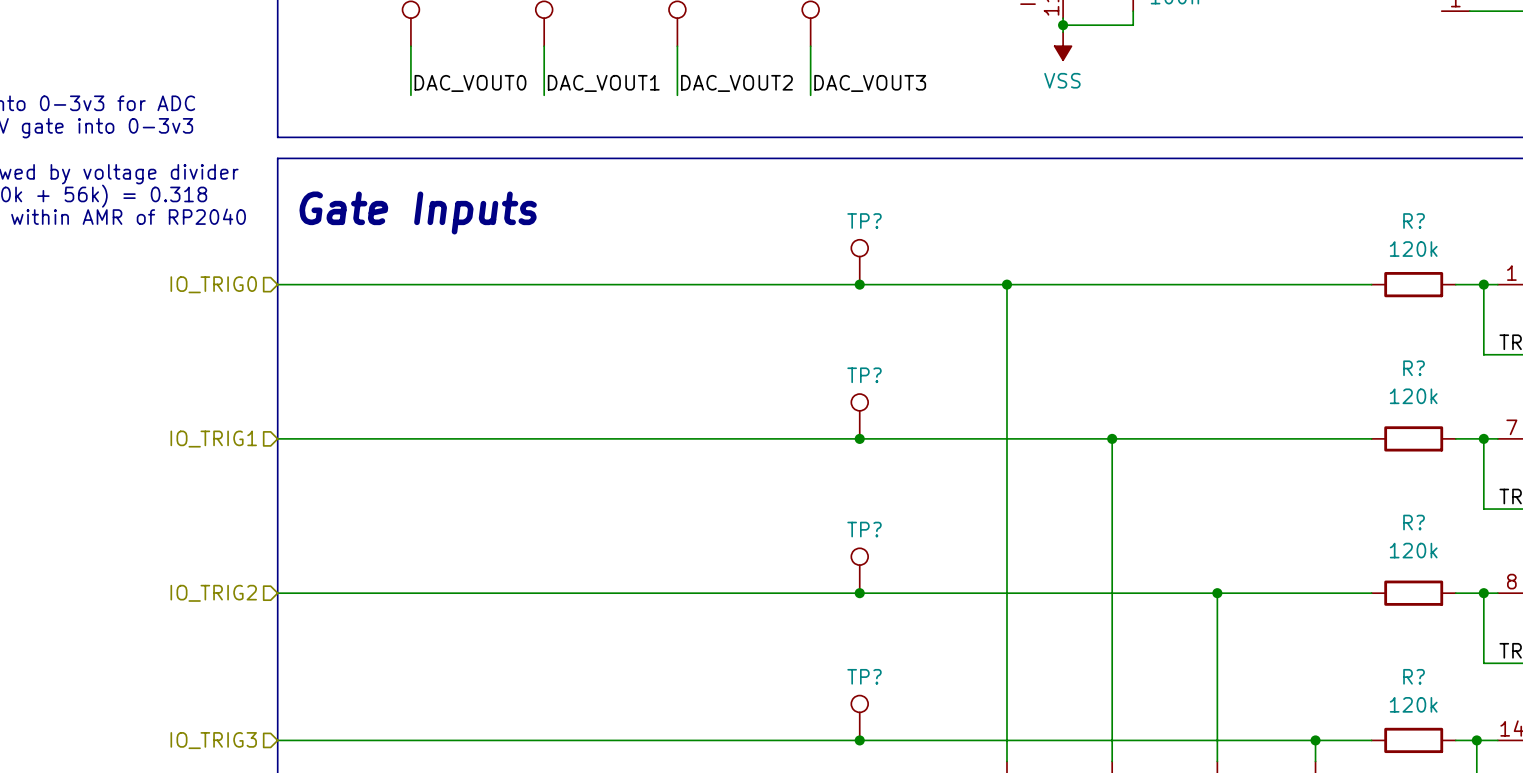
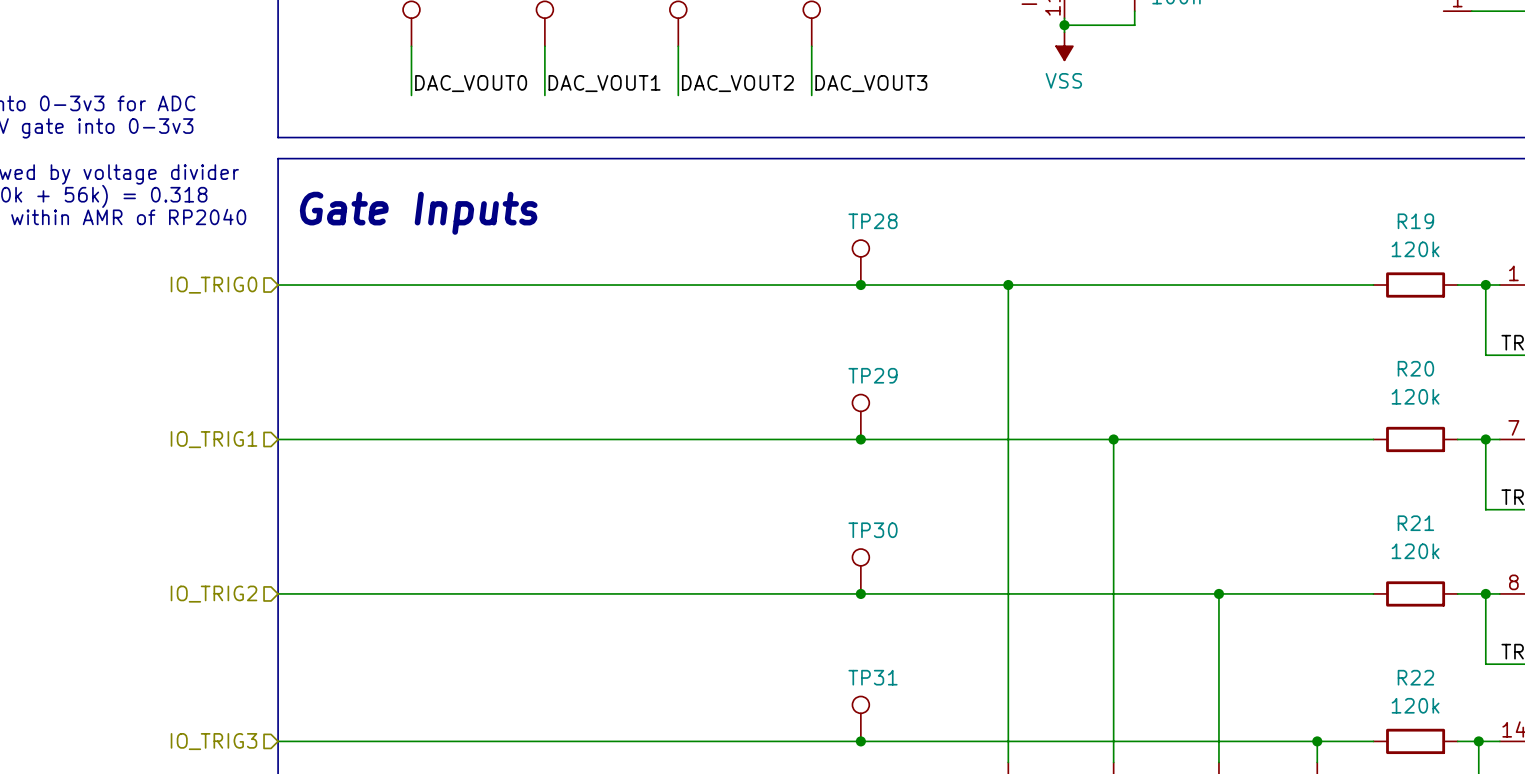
TP? name: TP? (864, 220) -> TP28 (873, 221)
R? name: R? (1414, 220) -> R19 (1415, 221)
R? name: R? (1414, 368) -> R20 (1415, 368)
TP? name: TP? (864, 375) -> TP29 (873, 375)
R? name: R? (1414, 522) -> R21 (1415, 523)
TP? name: TP? (864, 529) -> TP30 (873, 530)
TP? name: TP? (864, 676) -> TP31 (873, 677)
R? name: R? (1414, 676) -> R22 (1415, 677)

